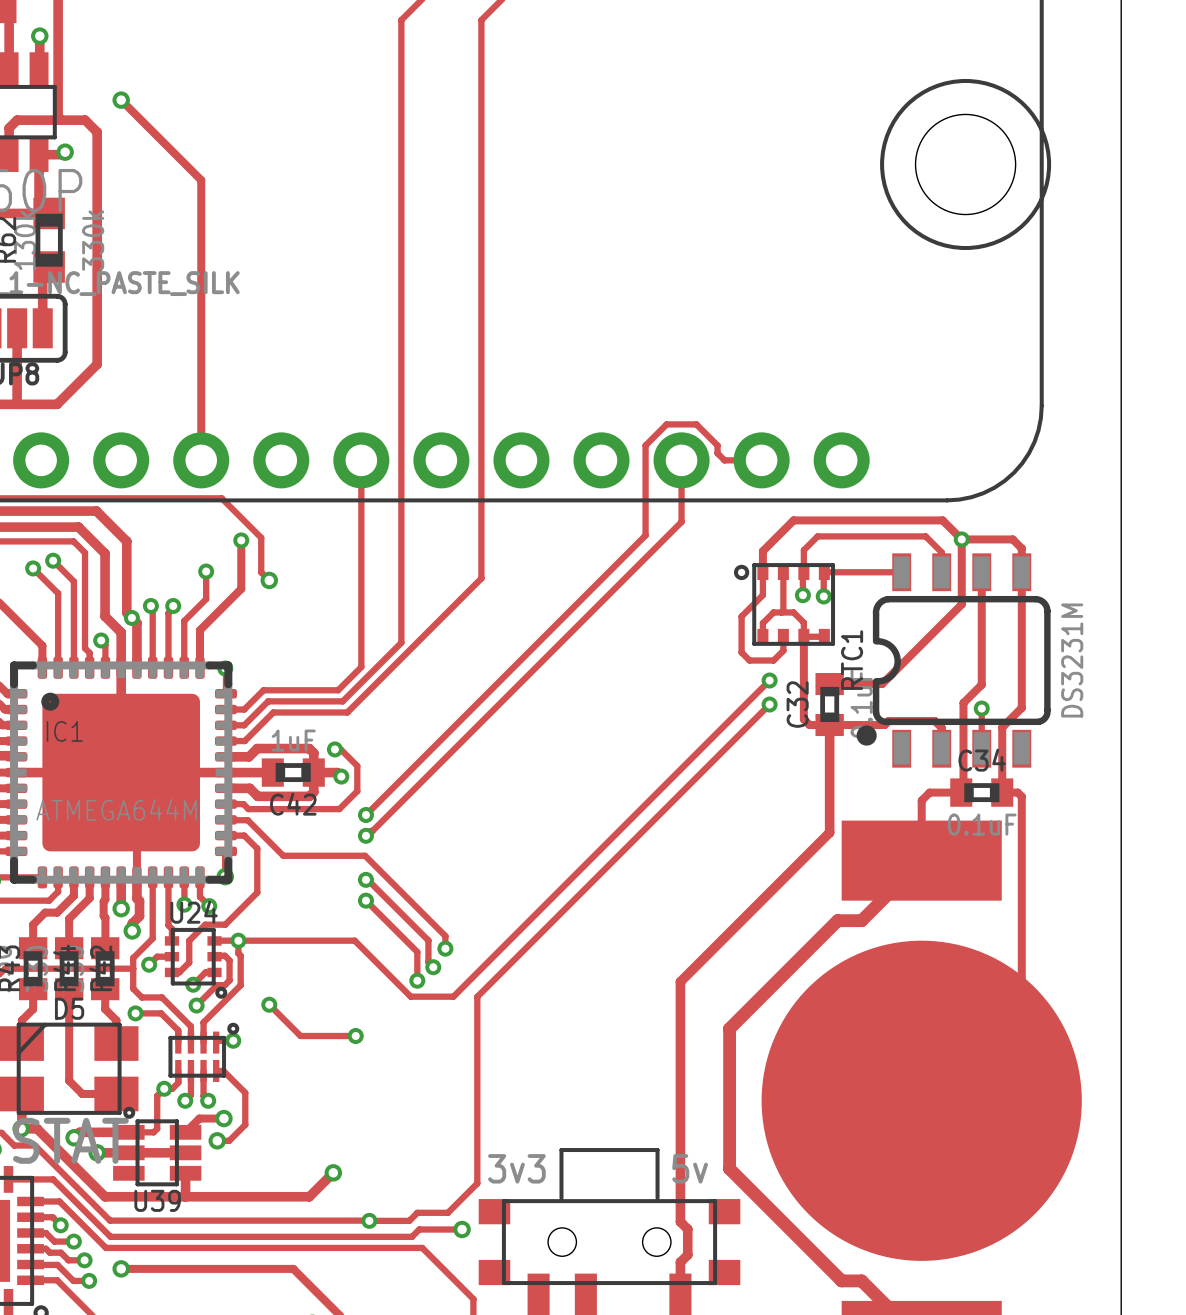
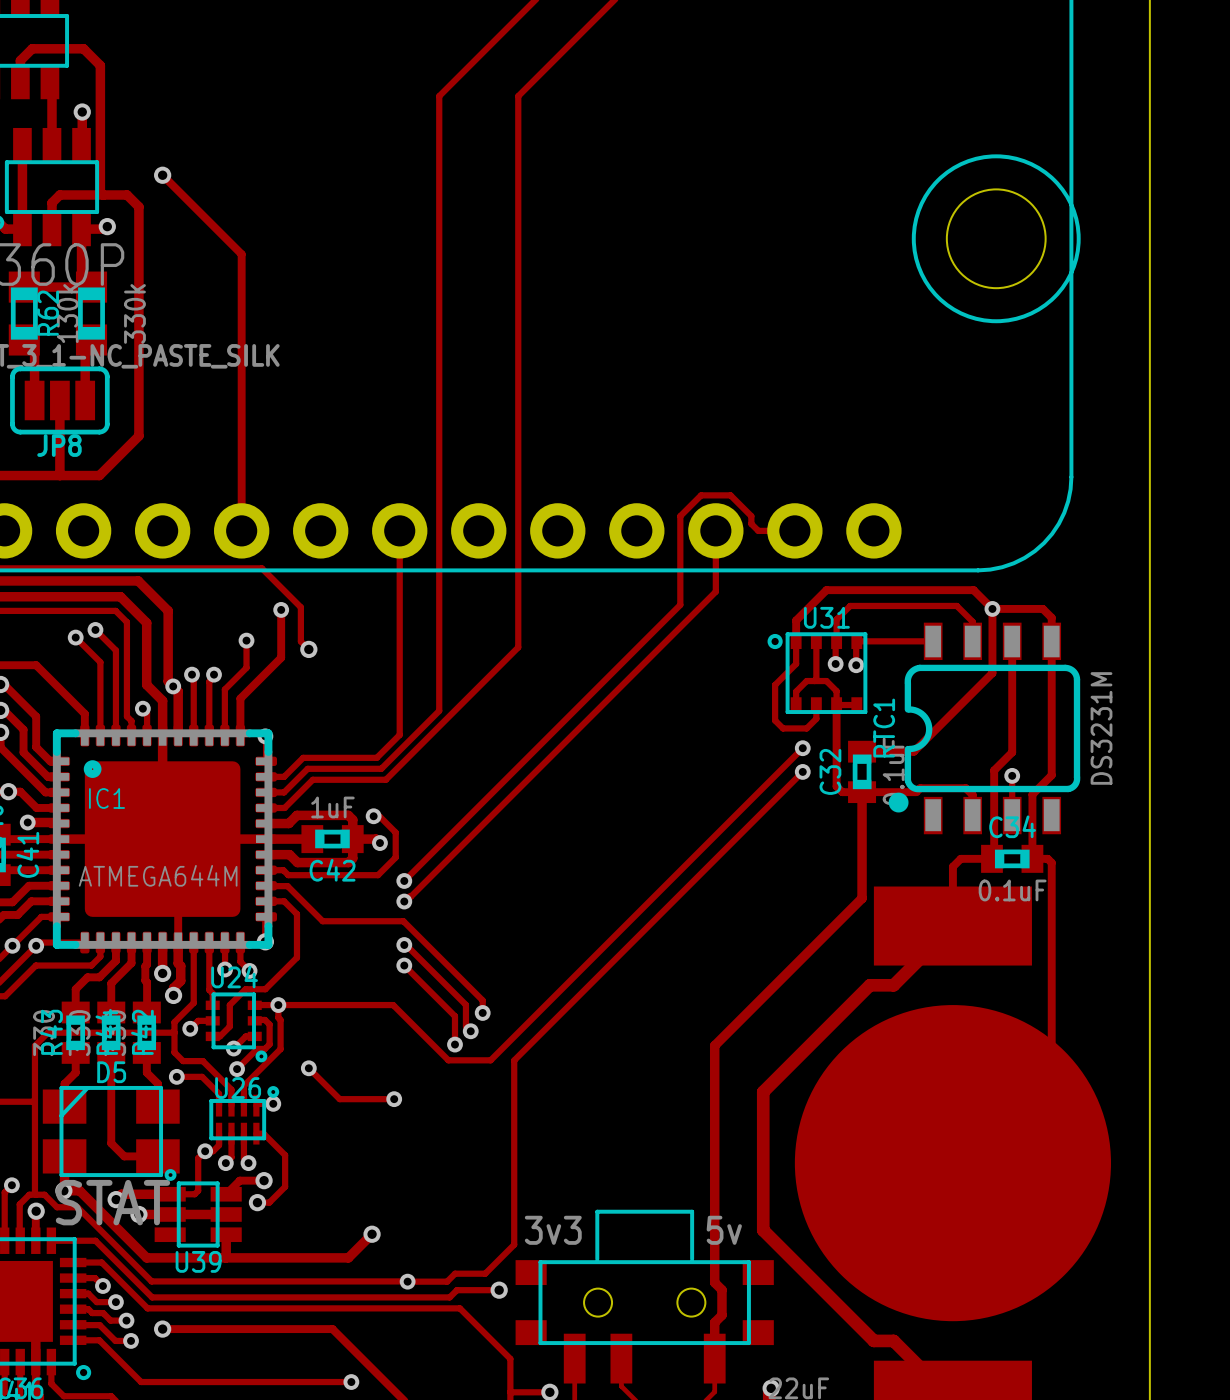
U31 name: none -> U31 (826, 617)
U26 name: none -> U26 (238, 1088)

